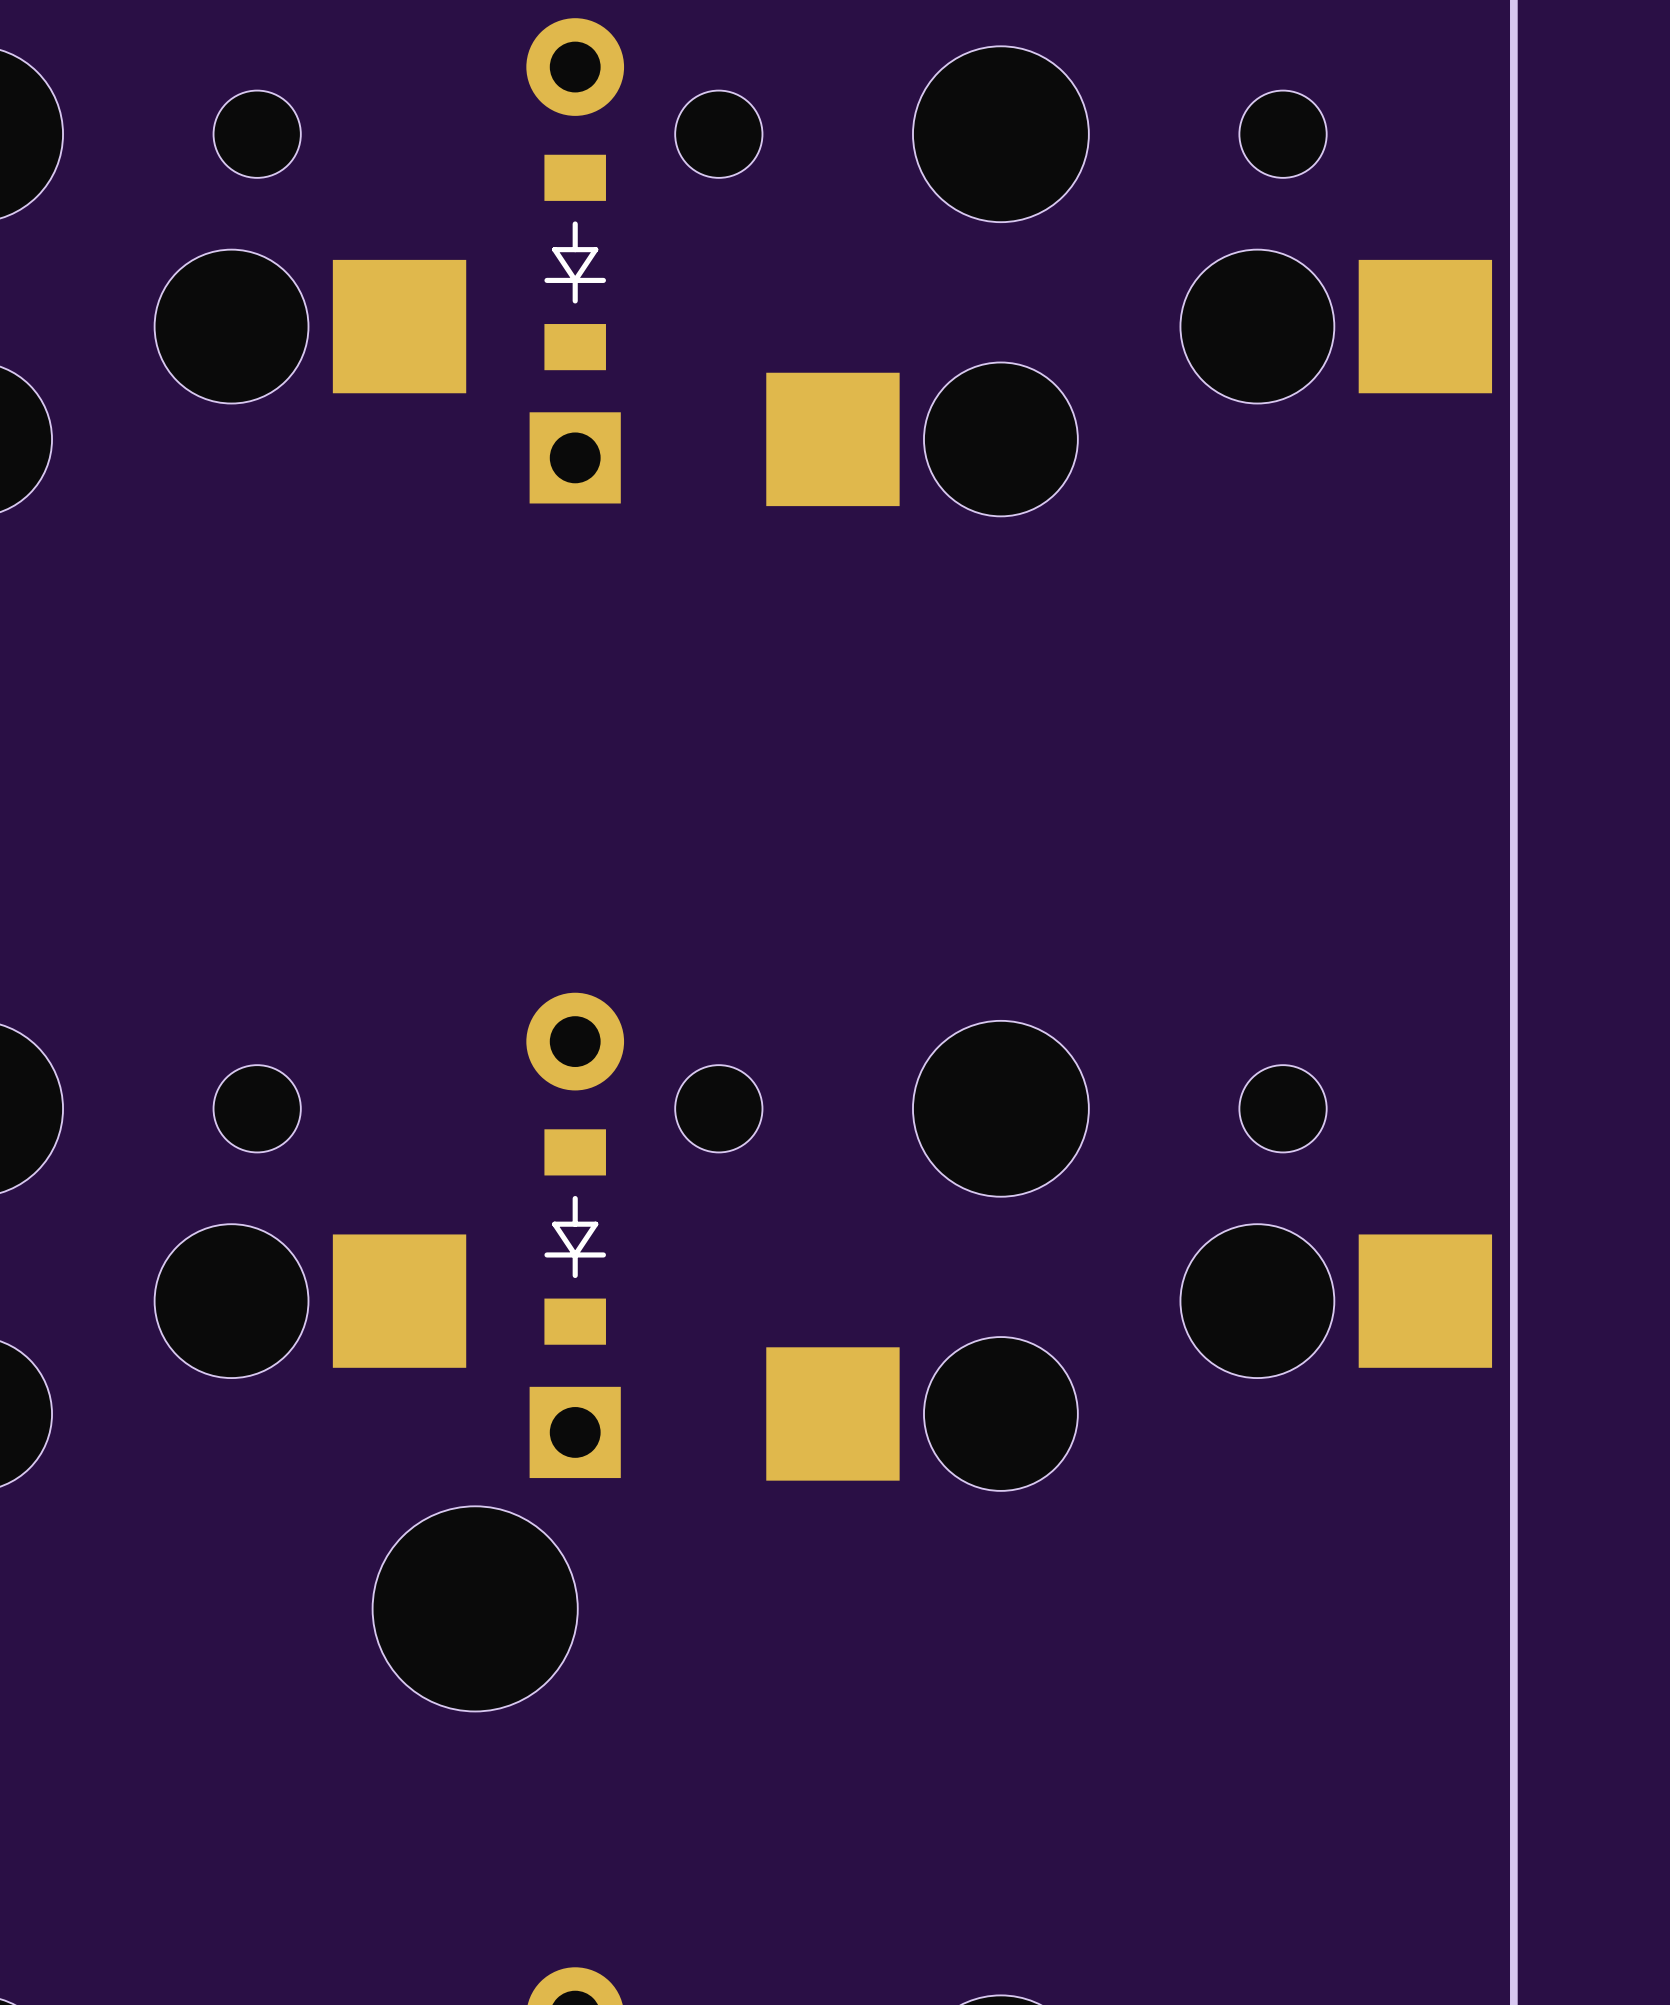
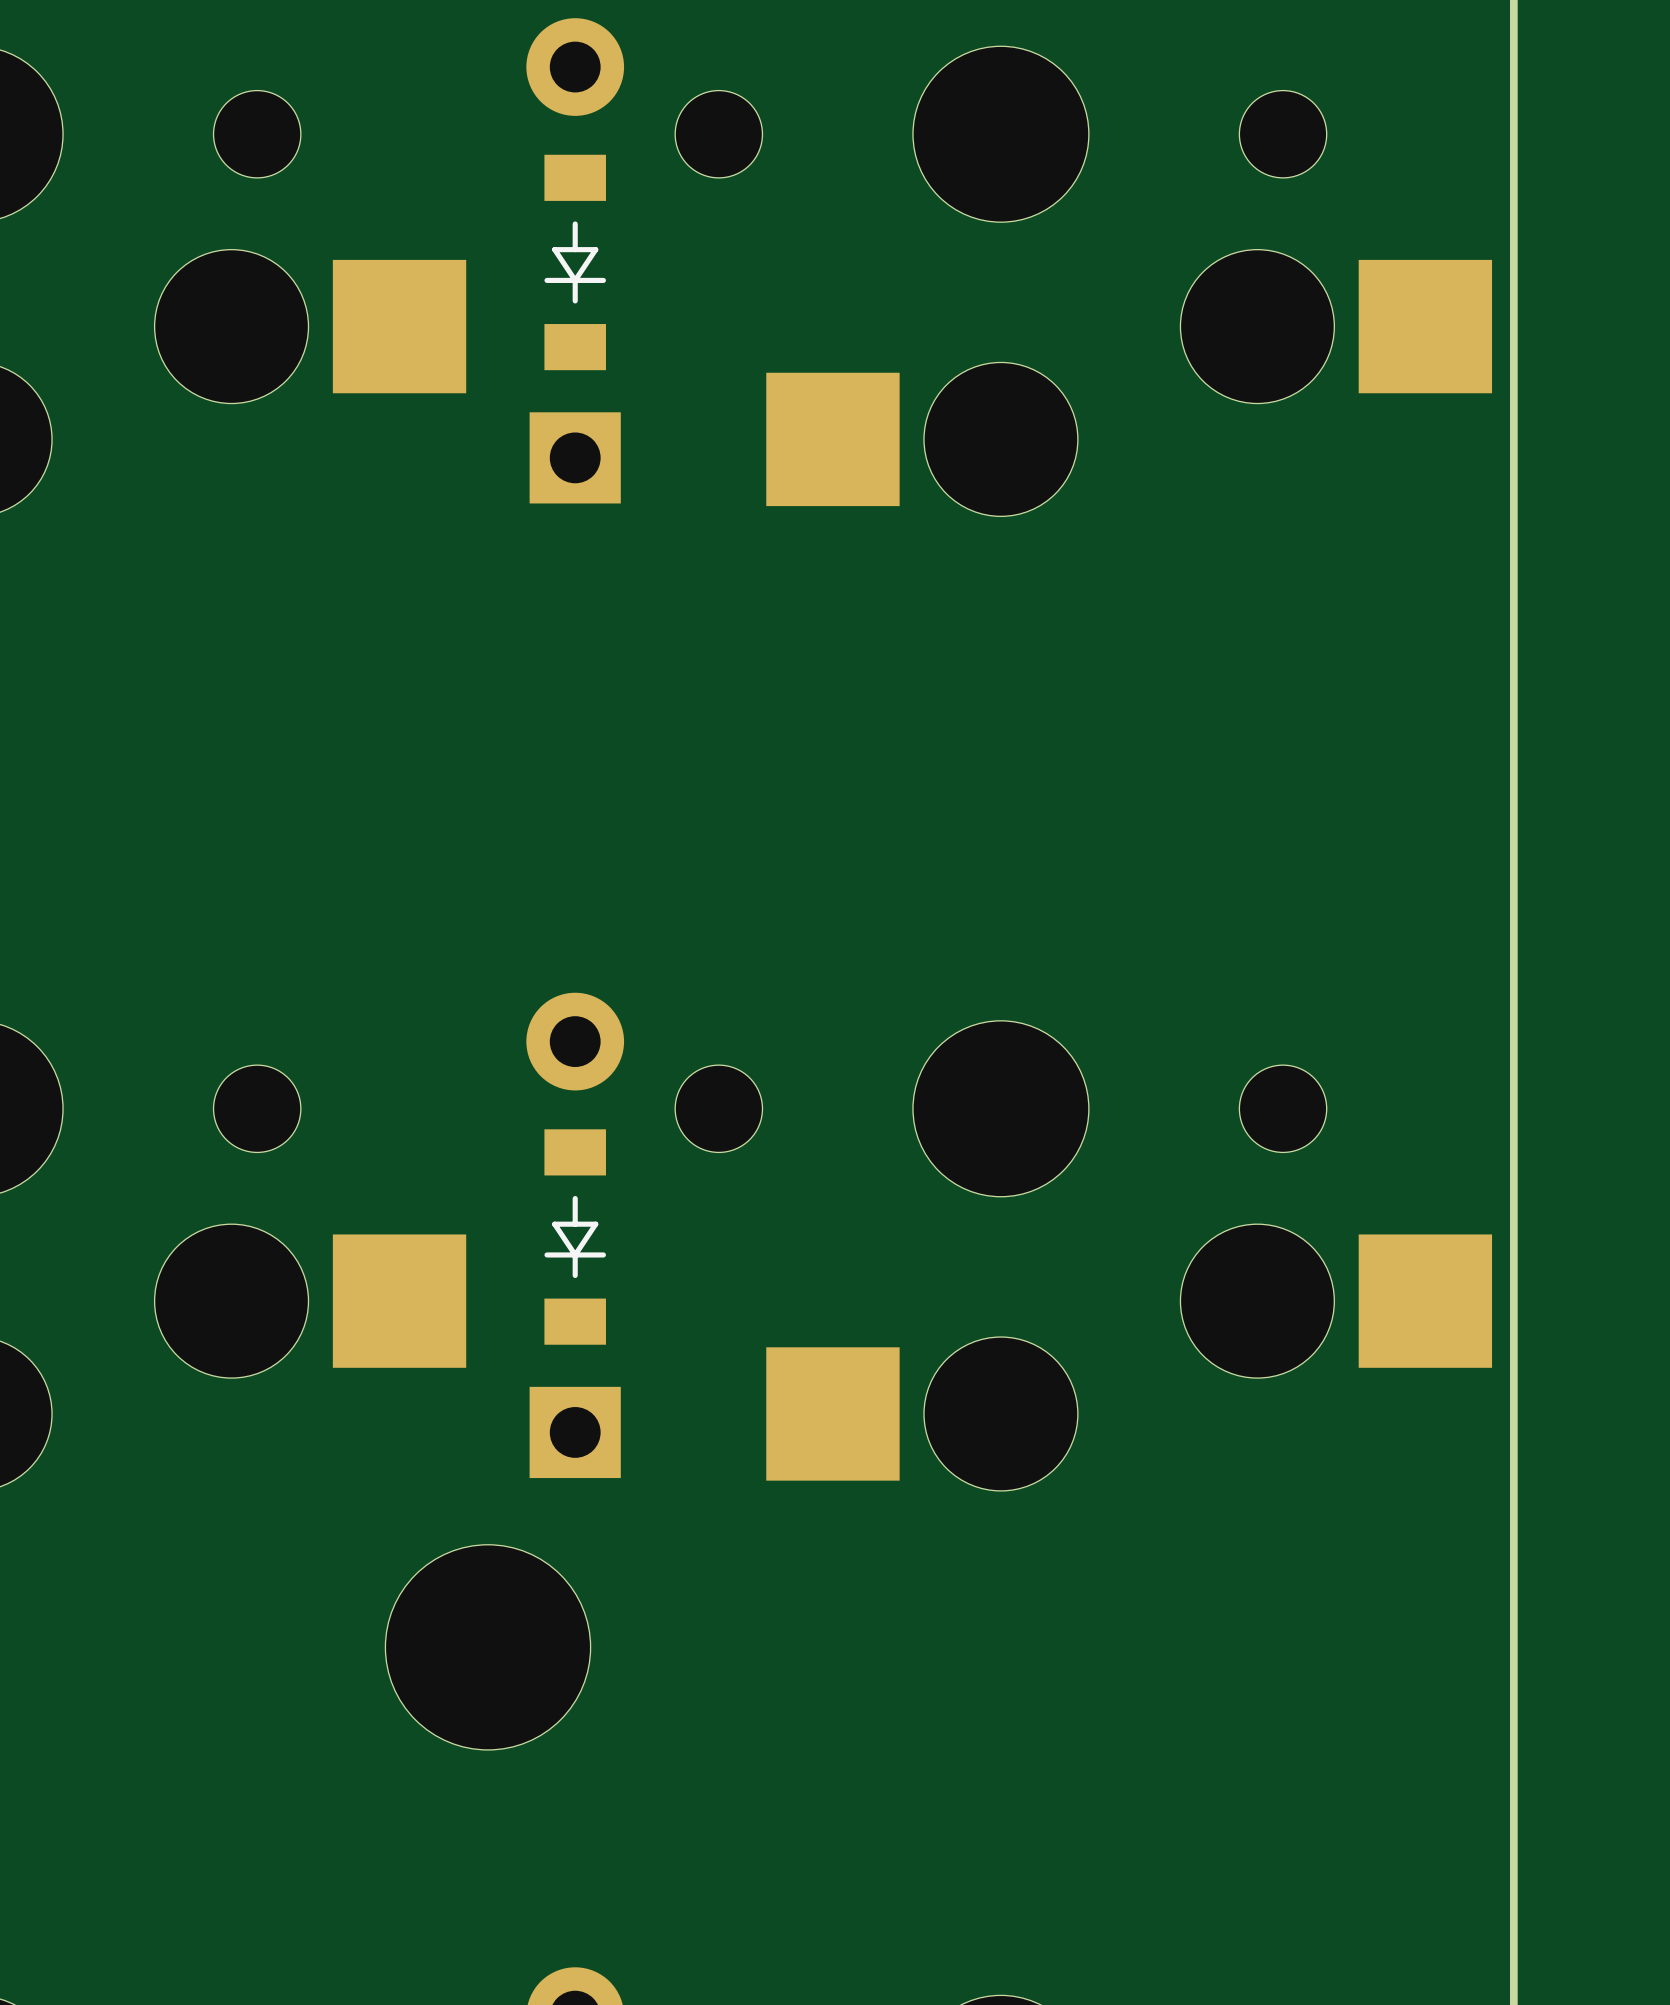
part position: (475, 1608) -> (488, 1647)

